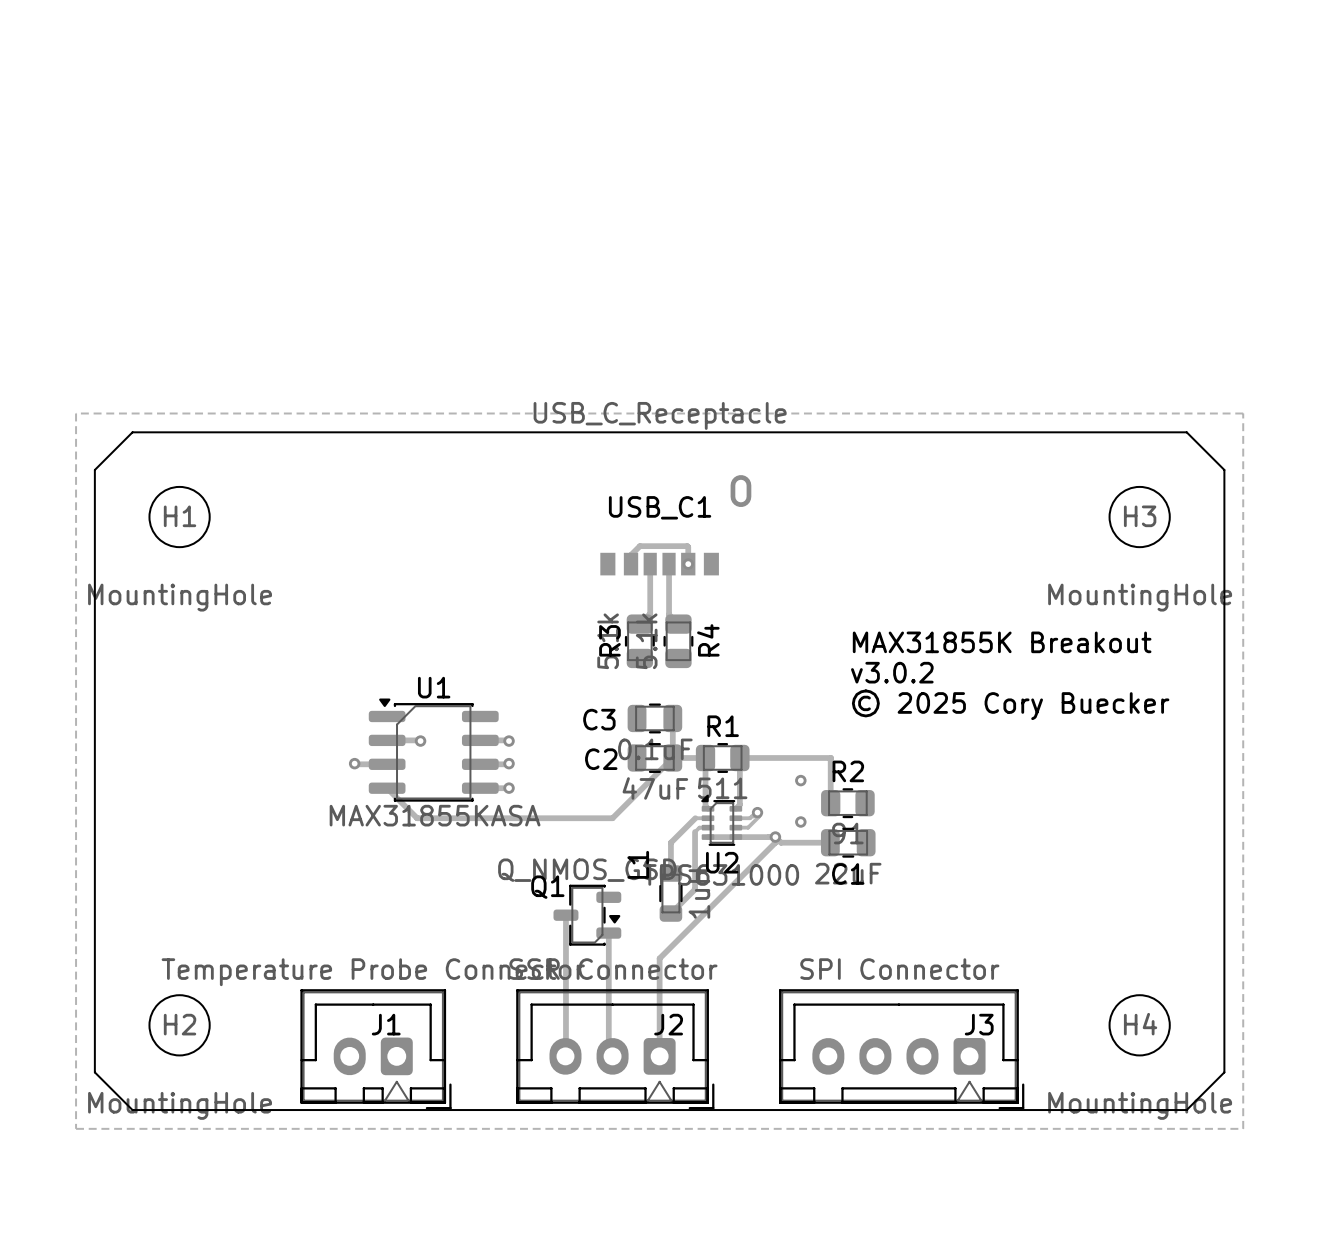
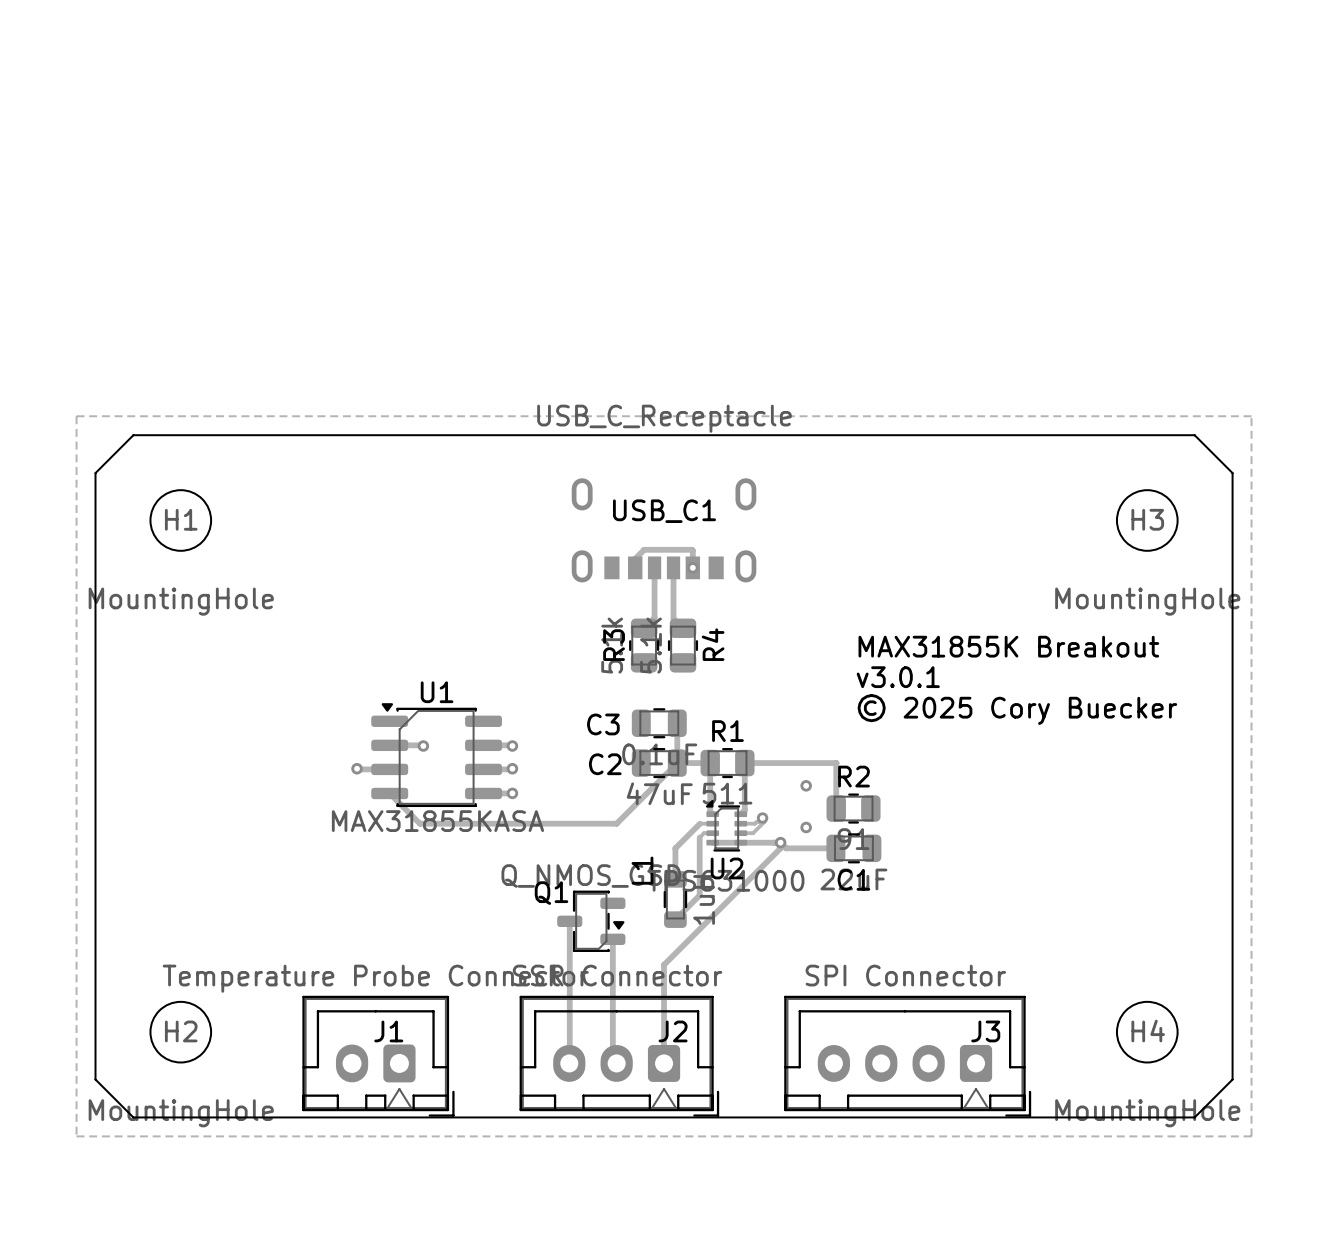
USB_C1 footprint: [572, 475, 752, 576] -> [571, 478, 757, 583]
text: v3.0.2 (892, 672) -> v3.0.1 (898, 677)

